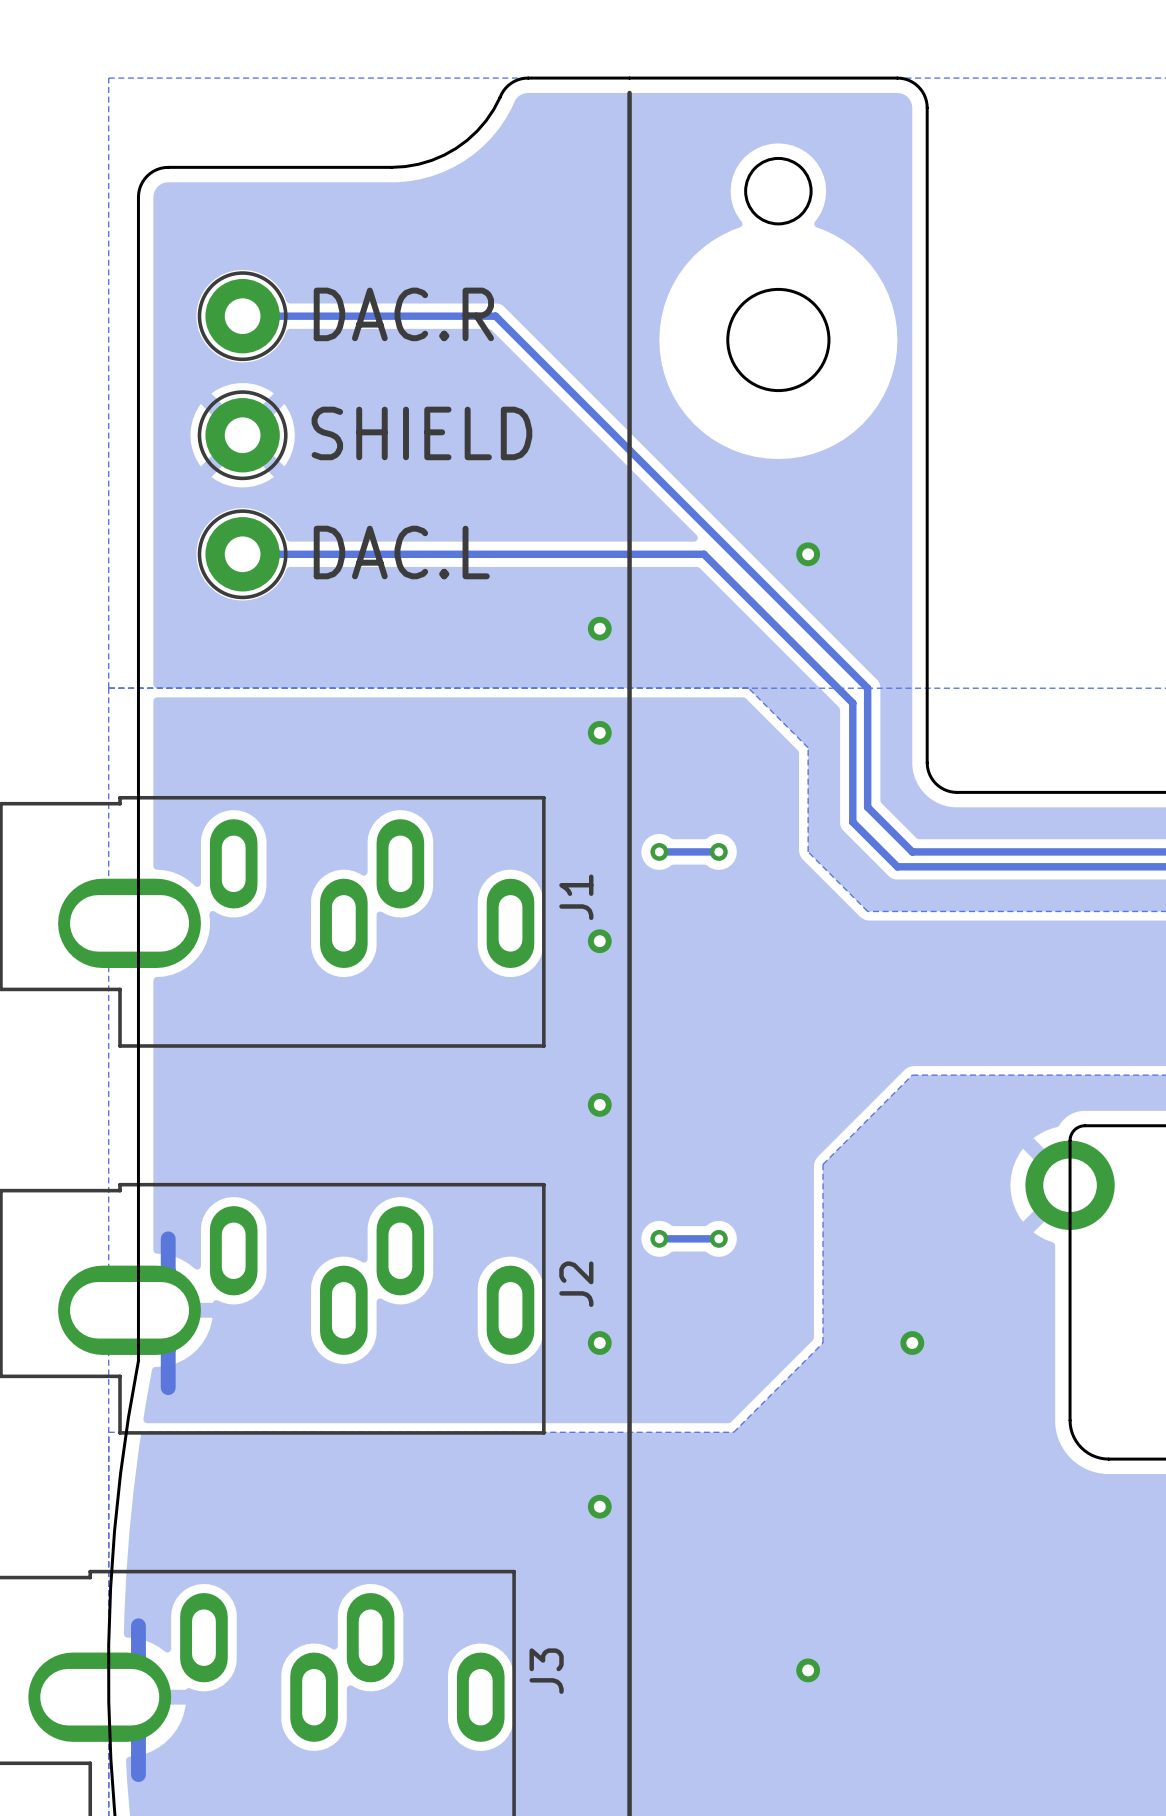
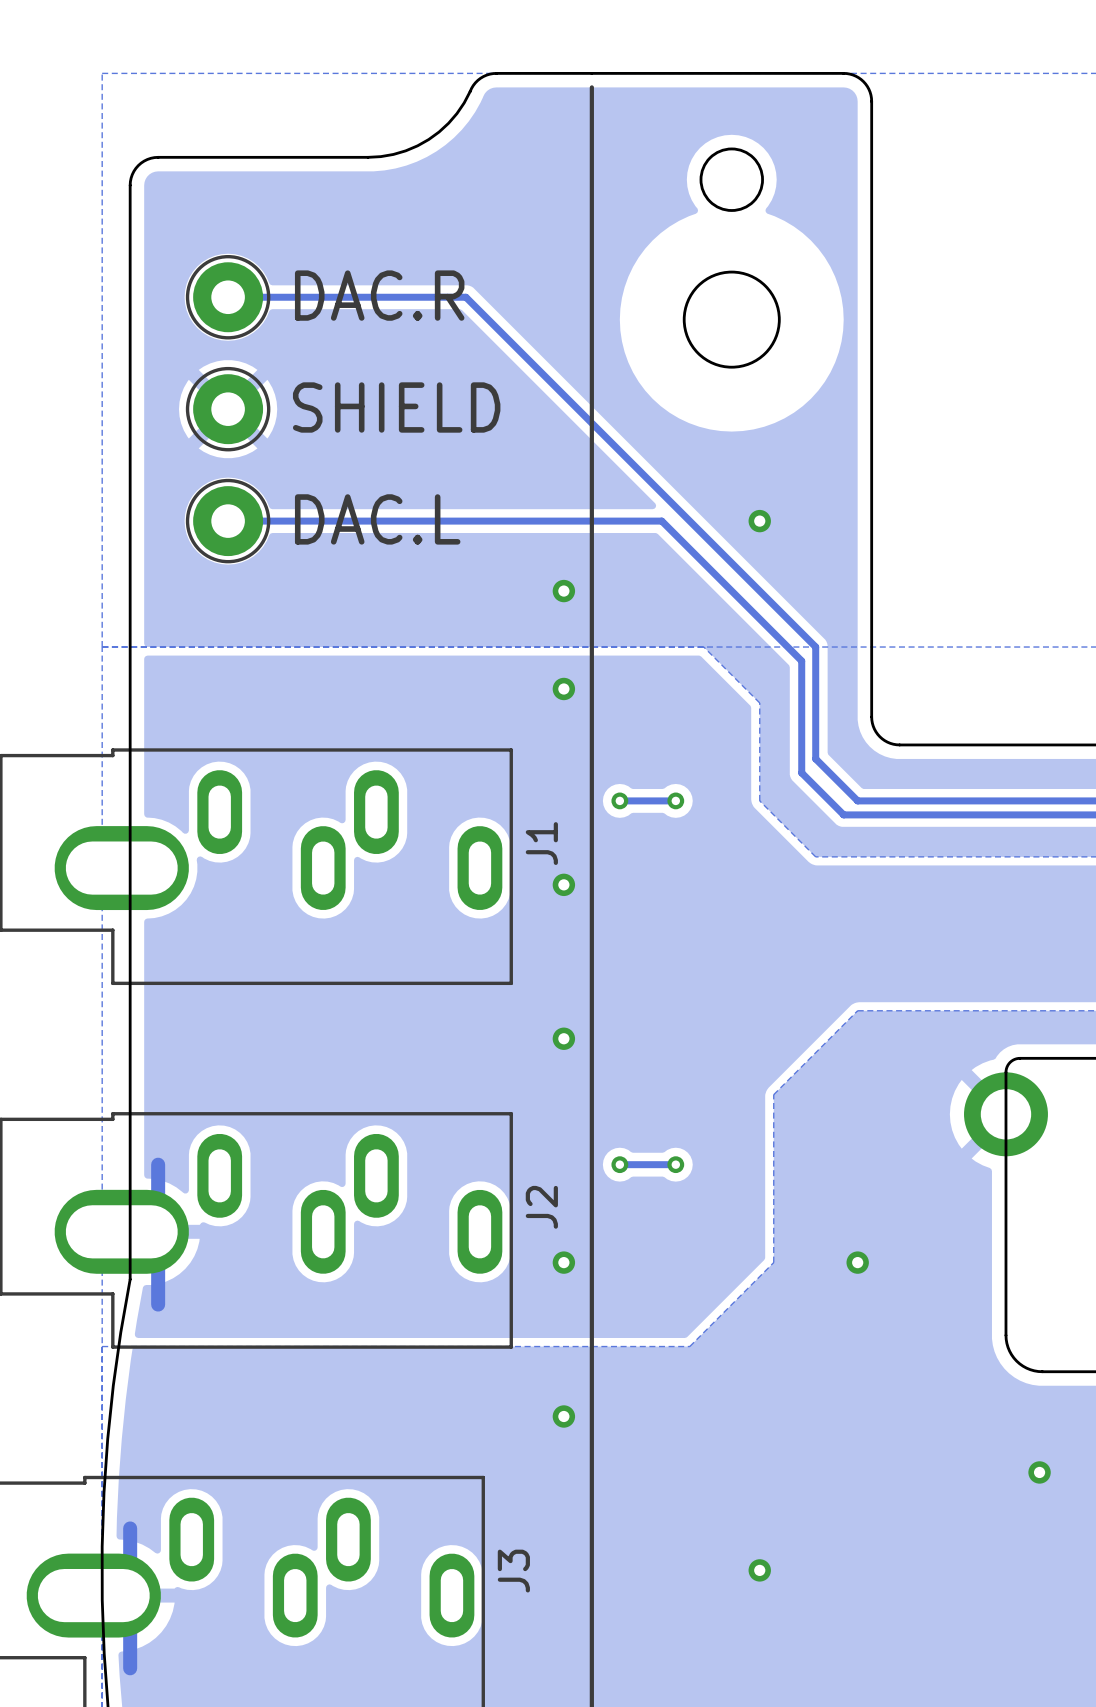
via: none -> (1039, 1472)

